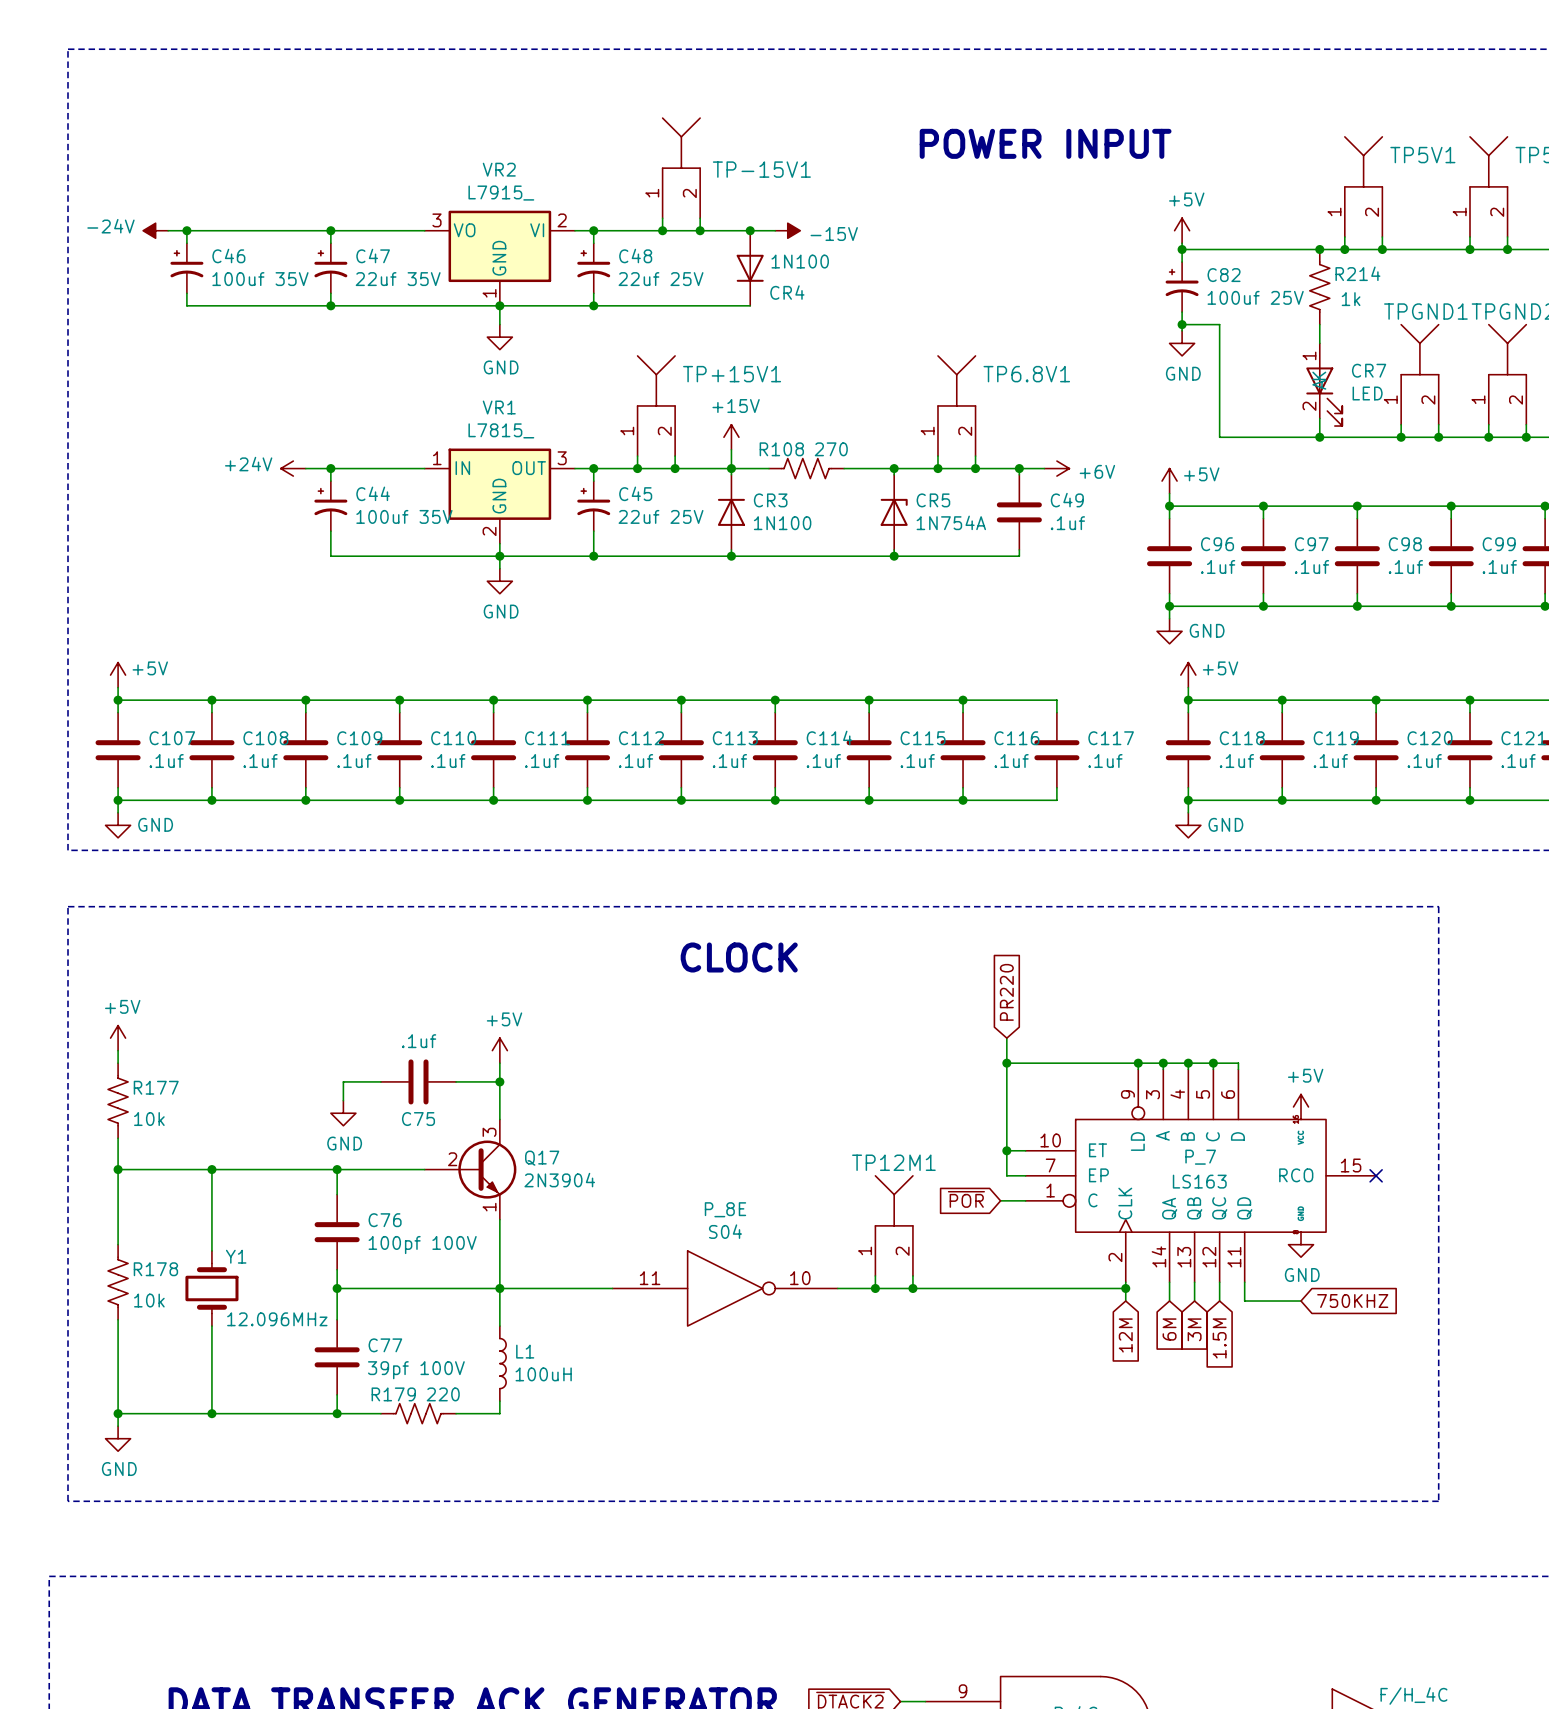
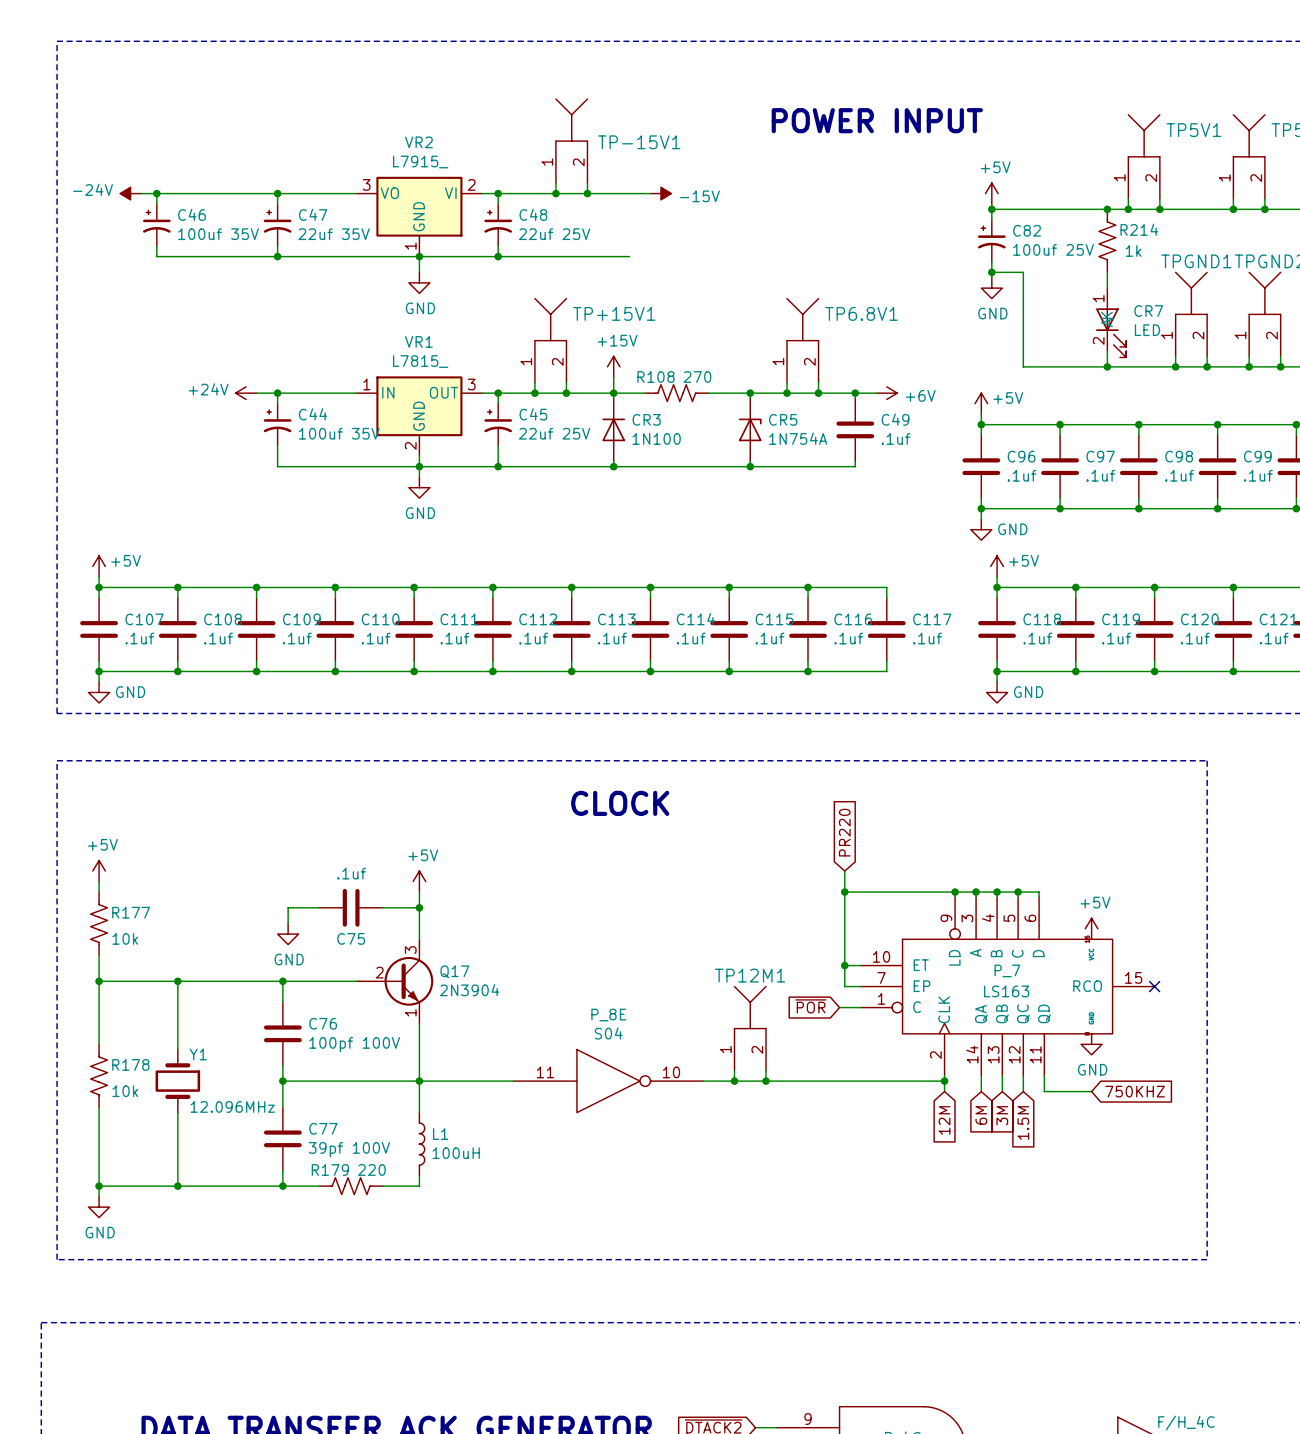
junction: (750, 230) -> none
CR4: 1N100 (750, 268) -> none

